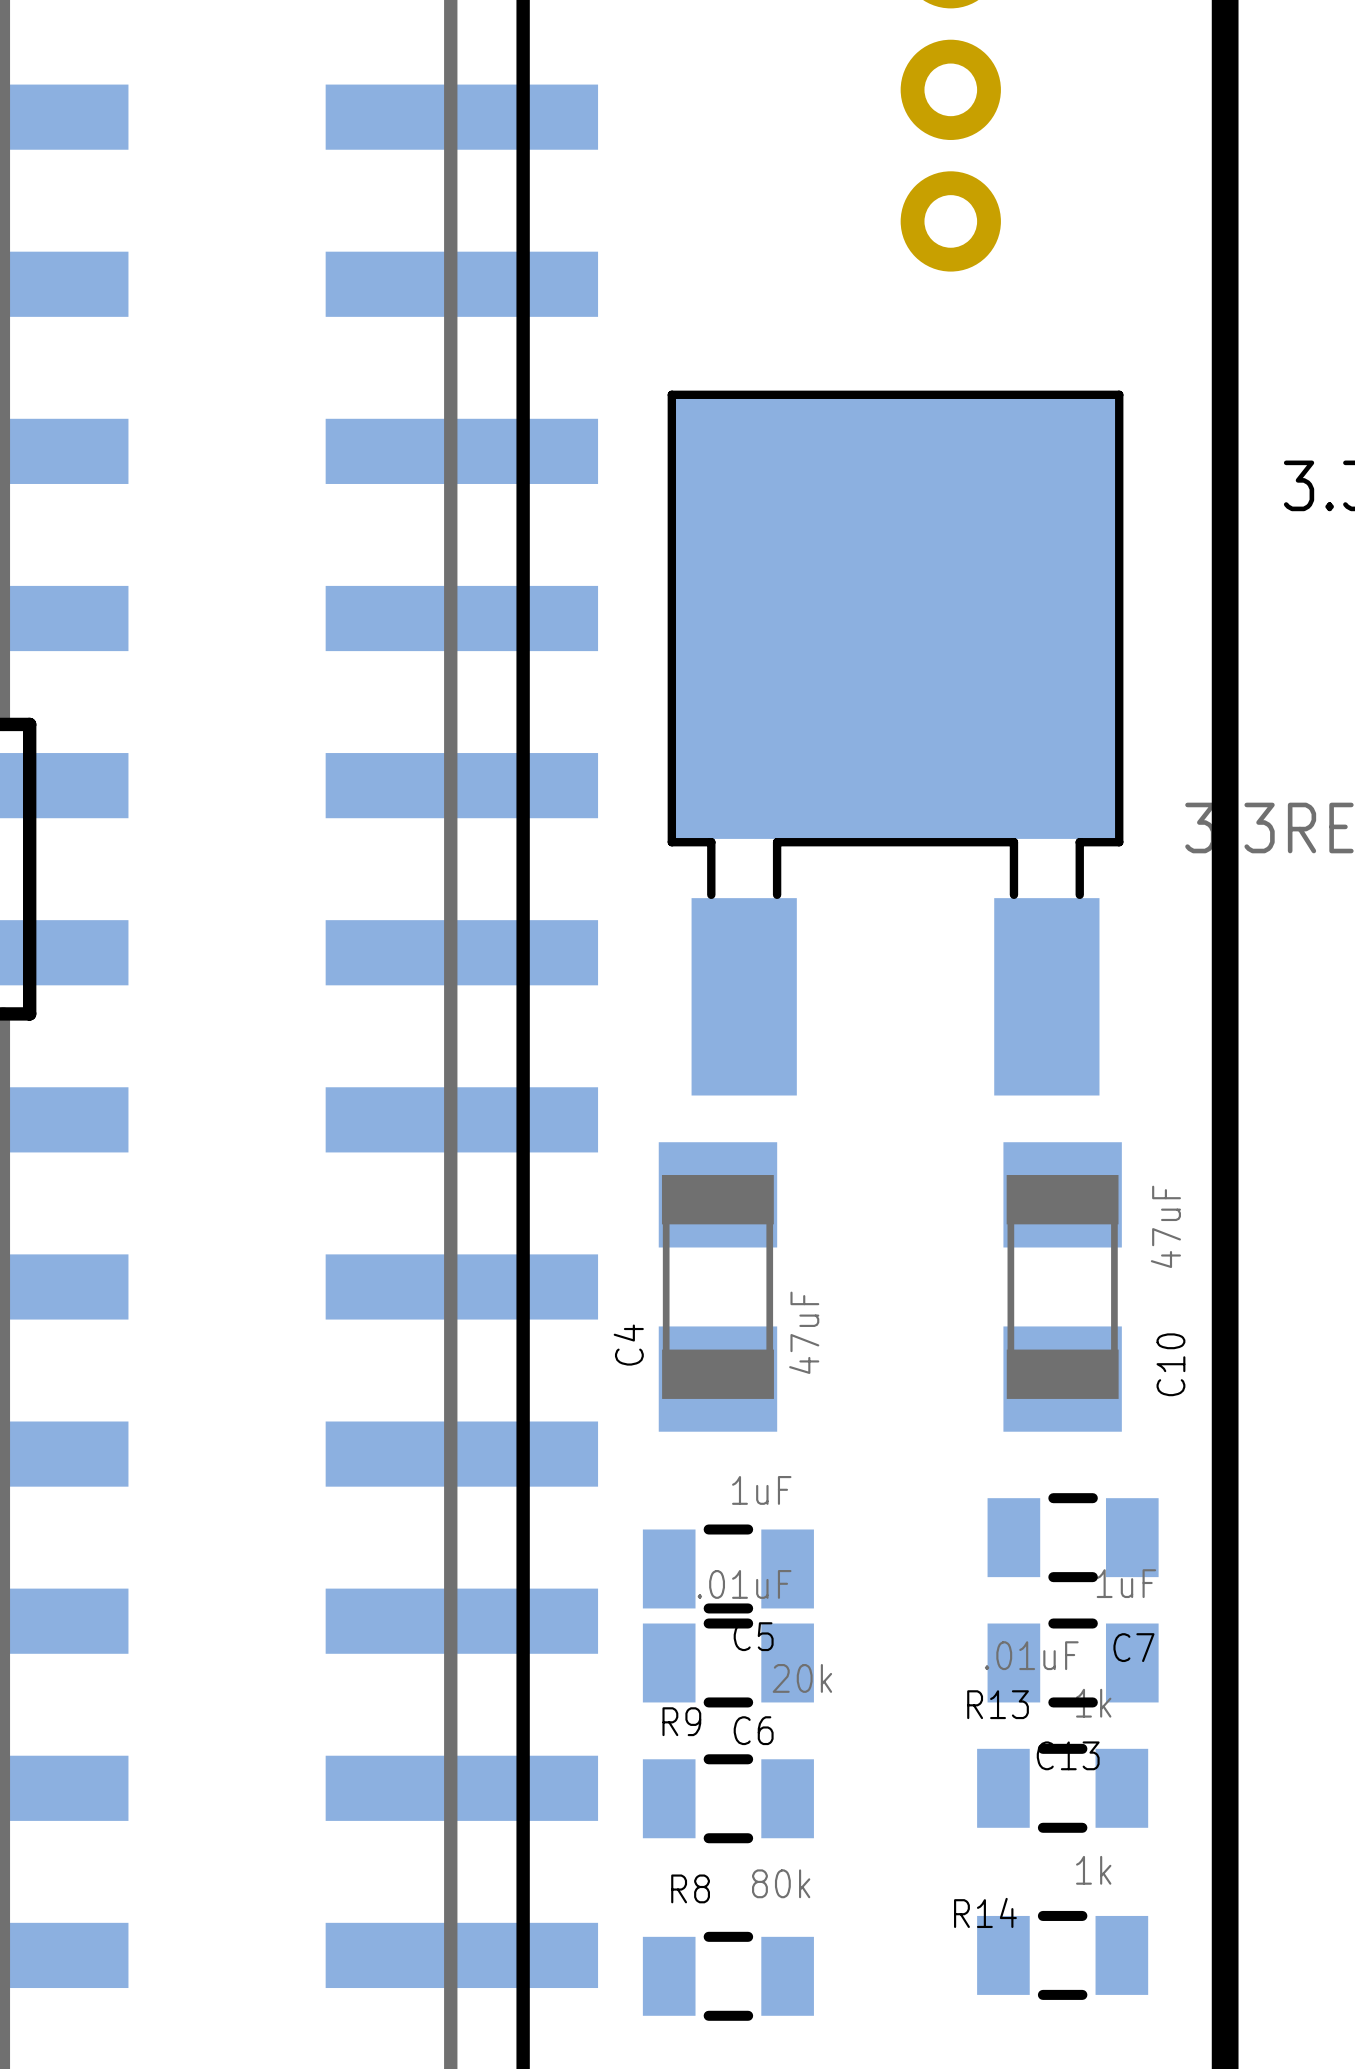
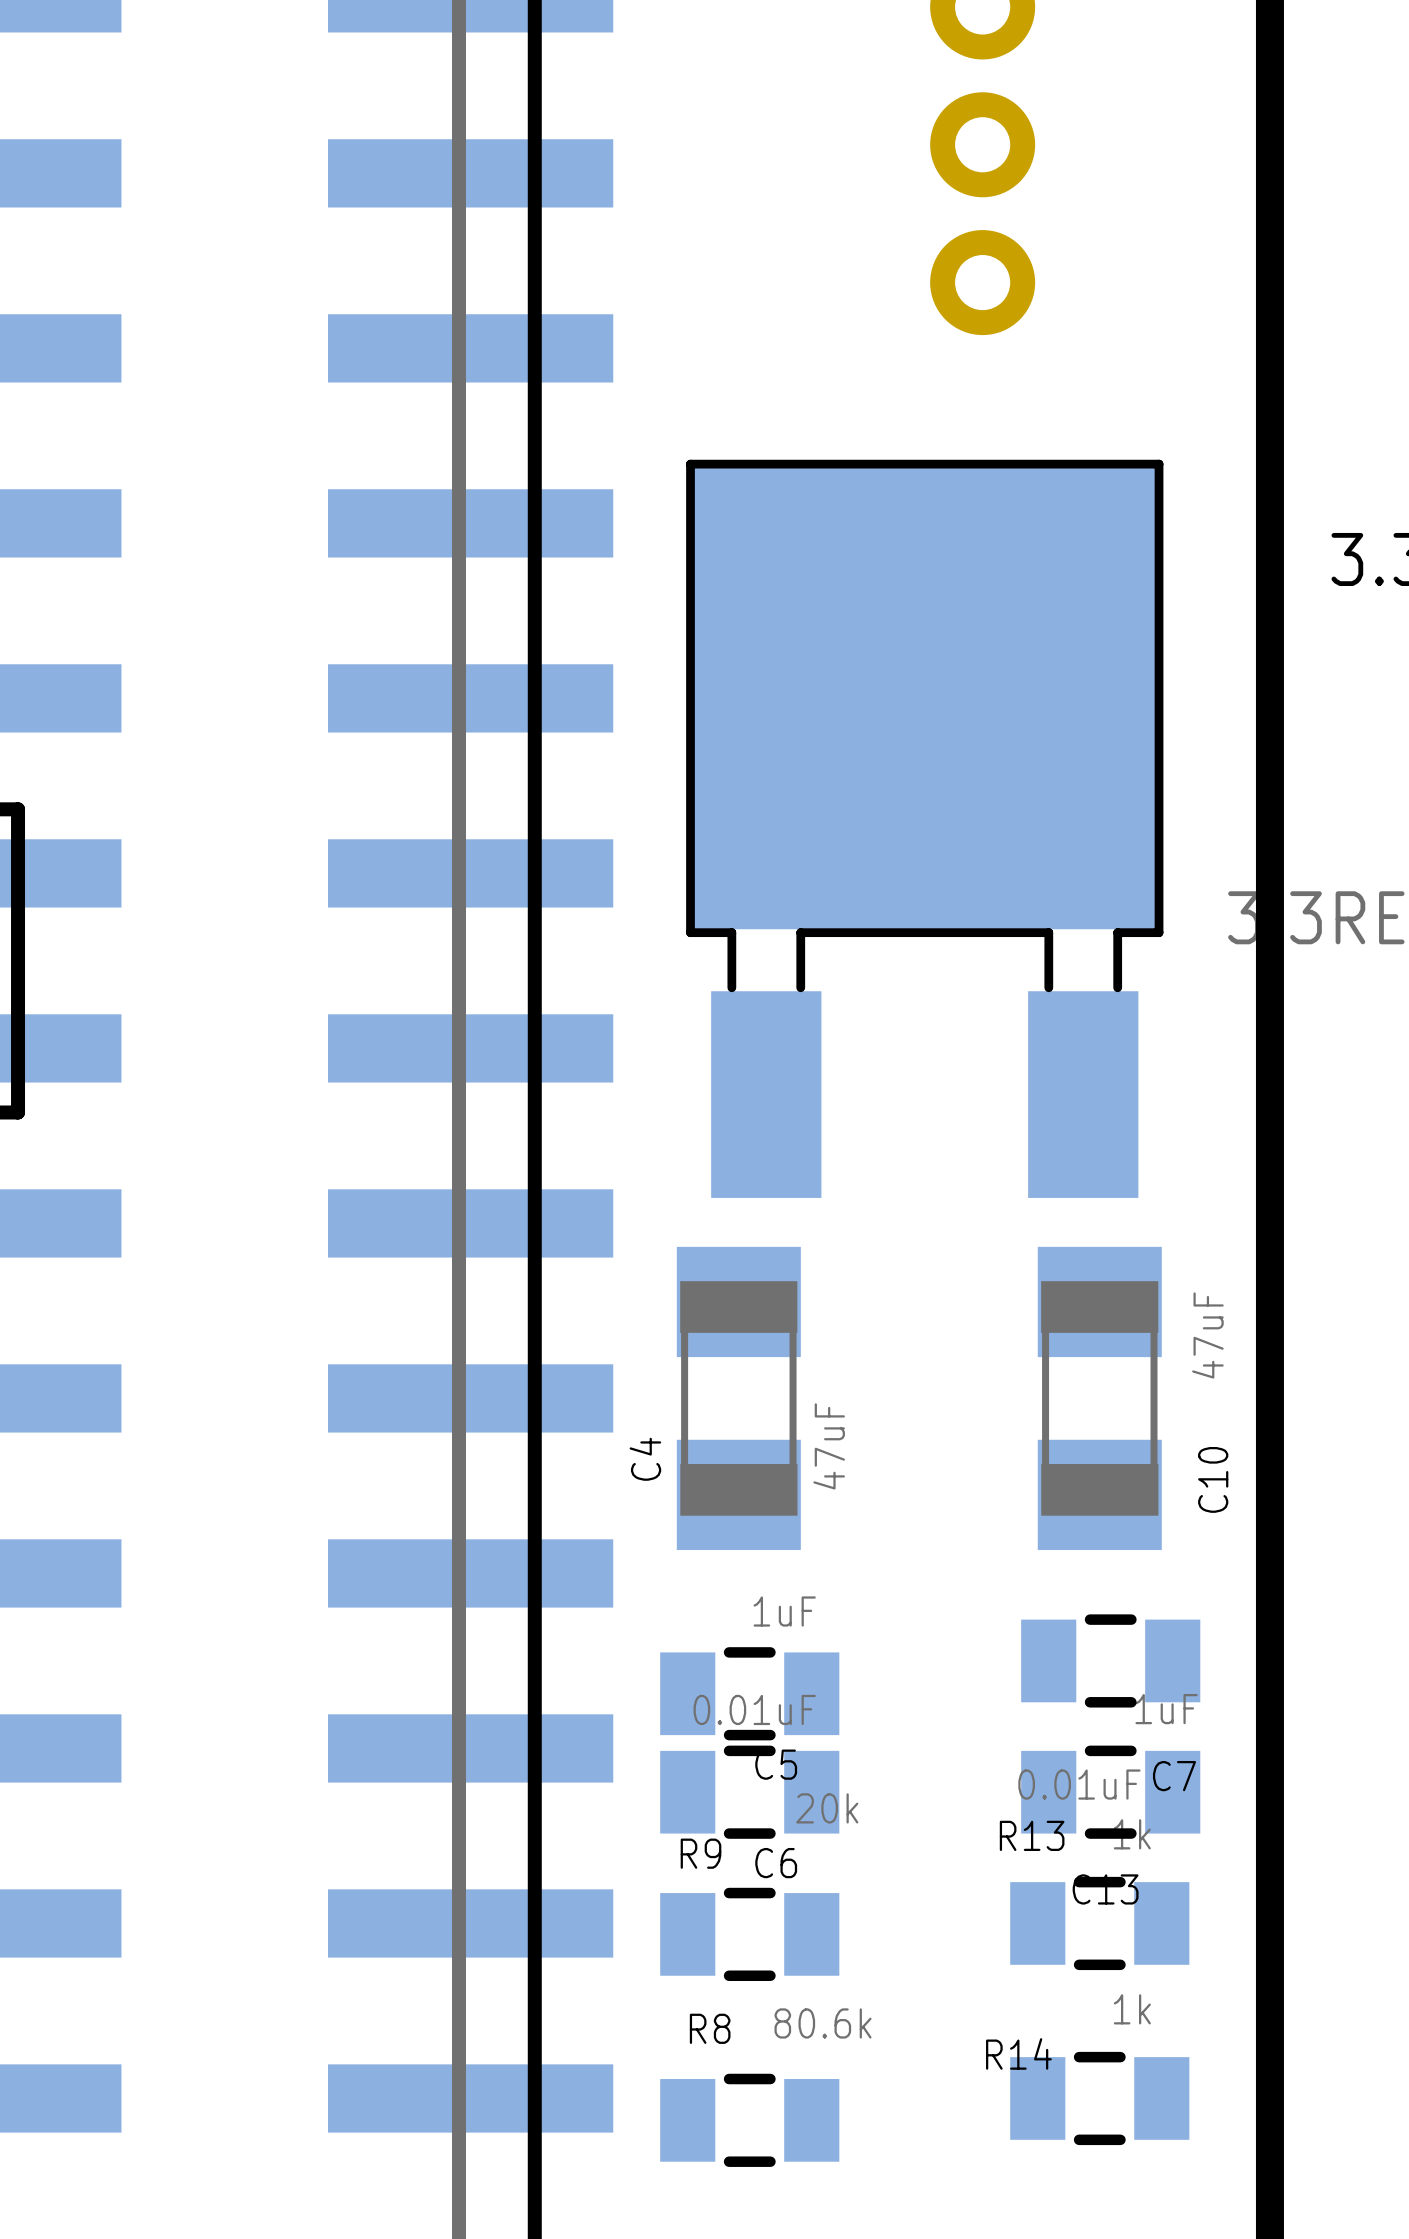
C6 value: .01uF (744, 1584) -> 0.01uF (754, 1709)
C7 value: .01uF (1031, 1655) -> 0.01uF (1079, 1784)
R8 value: 80k (781, 1883) -> 80.6k (823, 2023)

